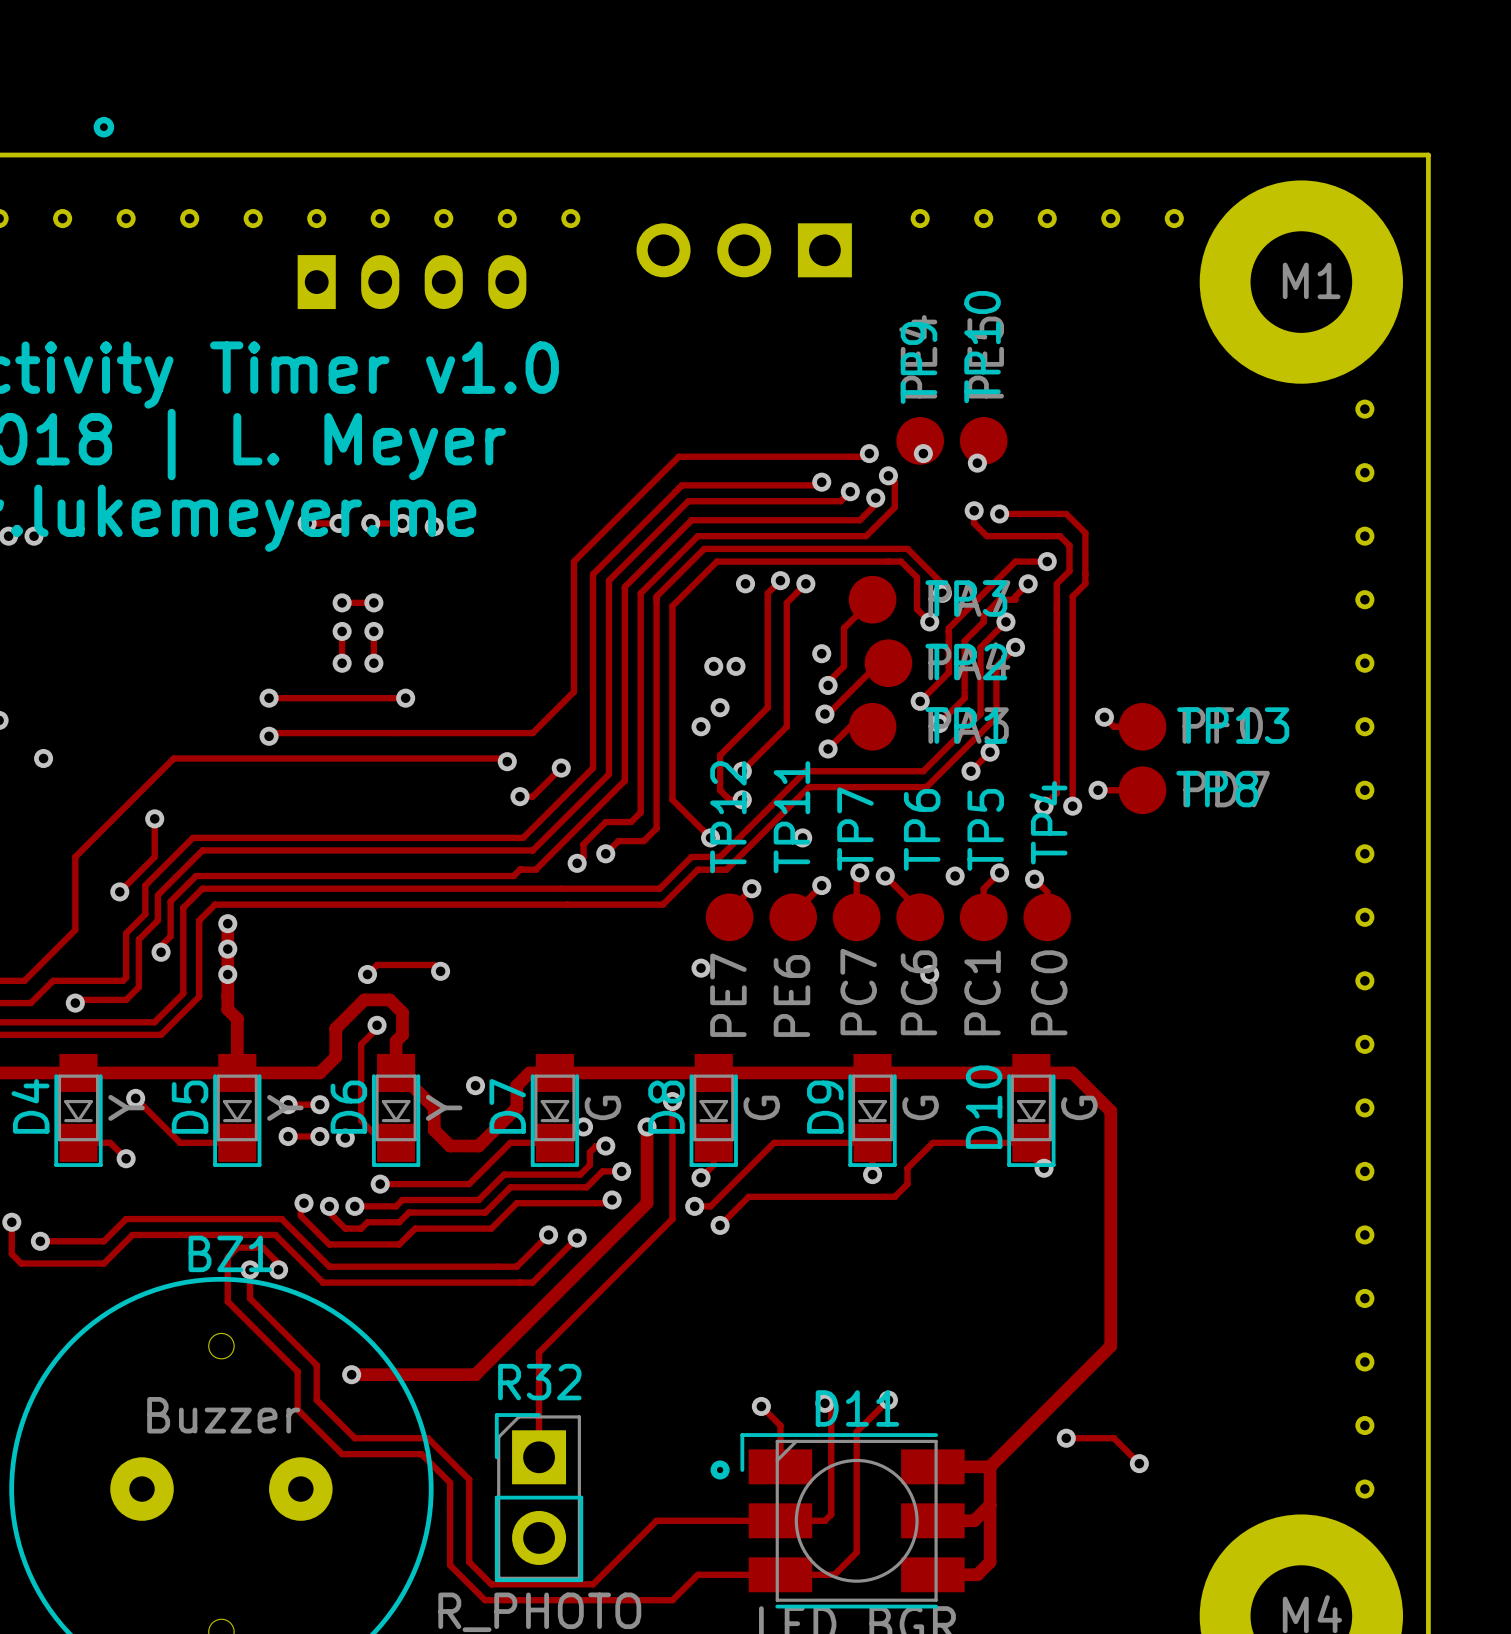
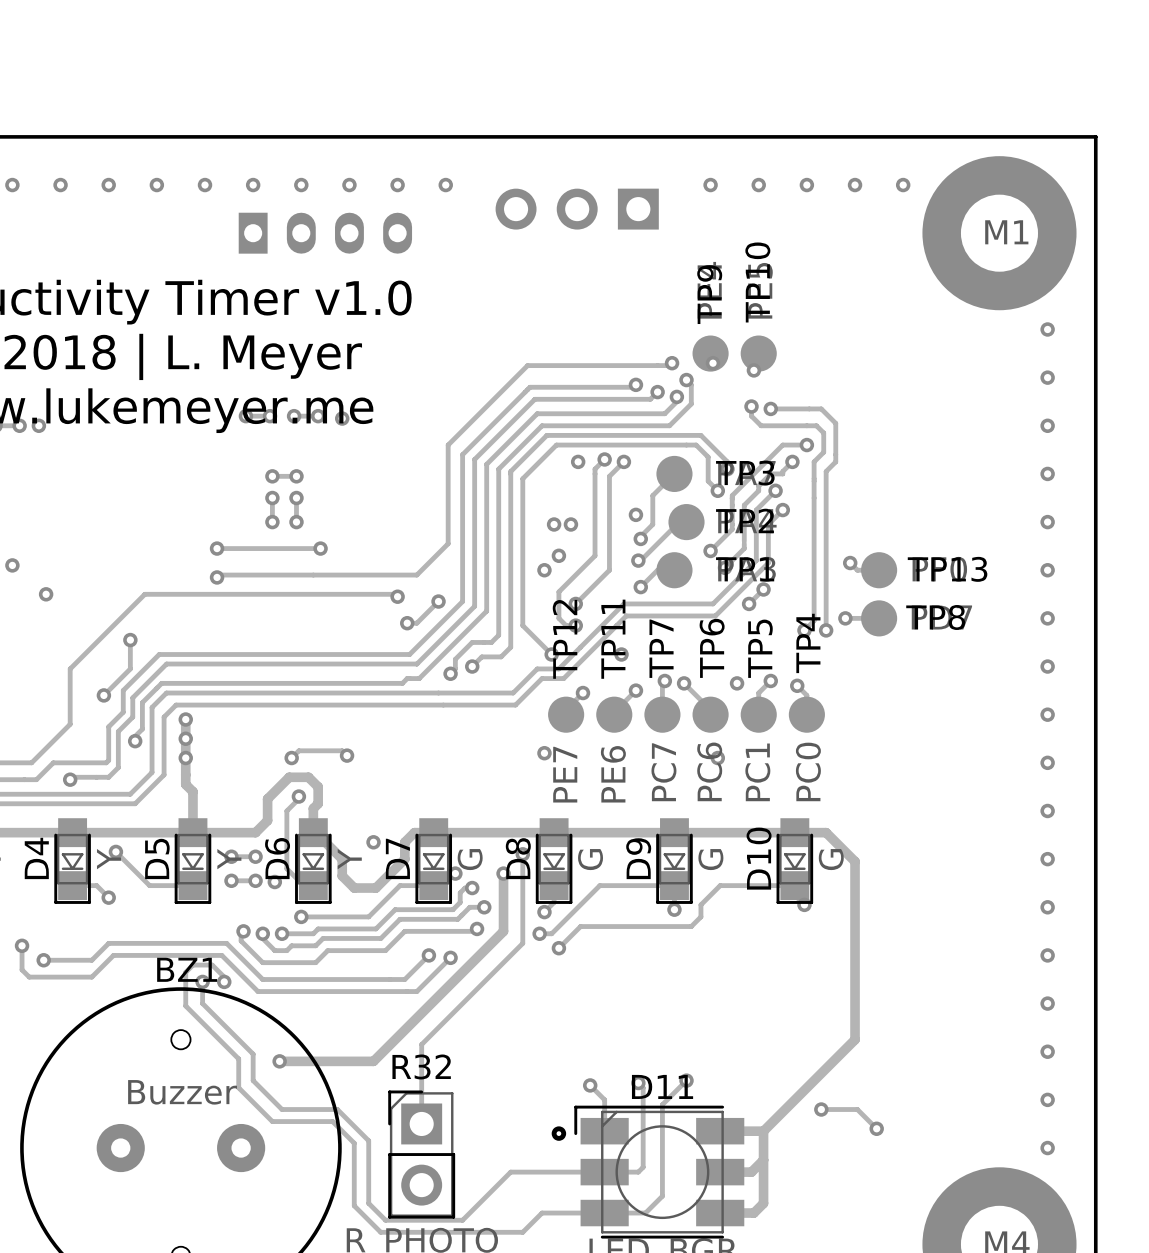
drawing: [93, 116, 115, 138] -> none

